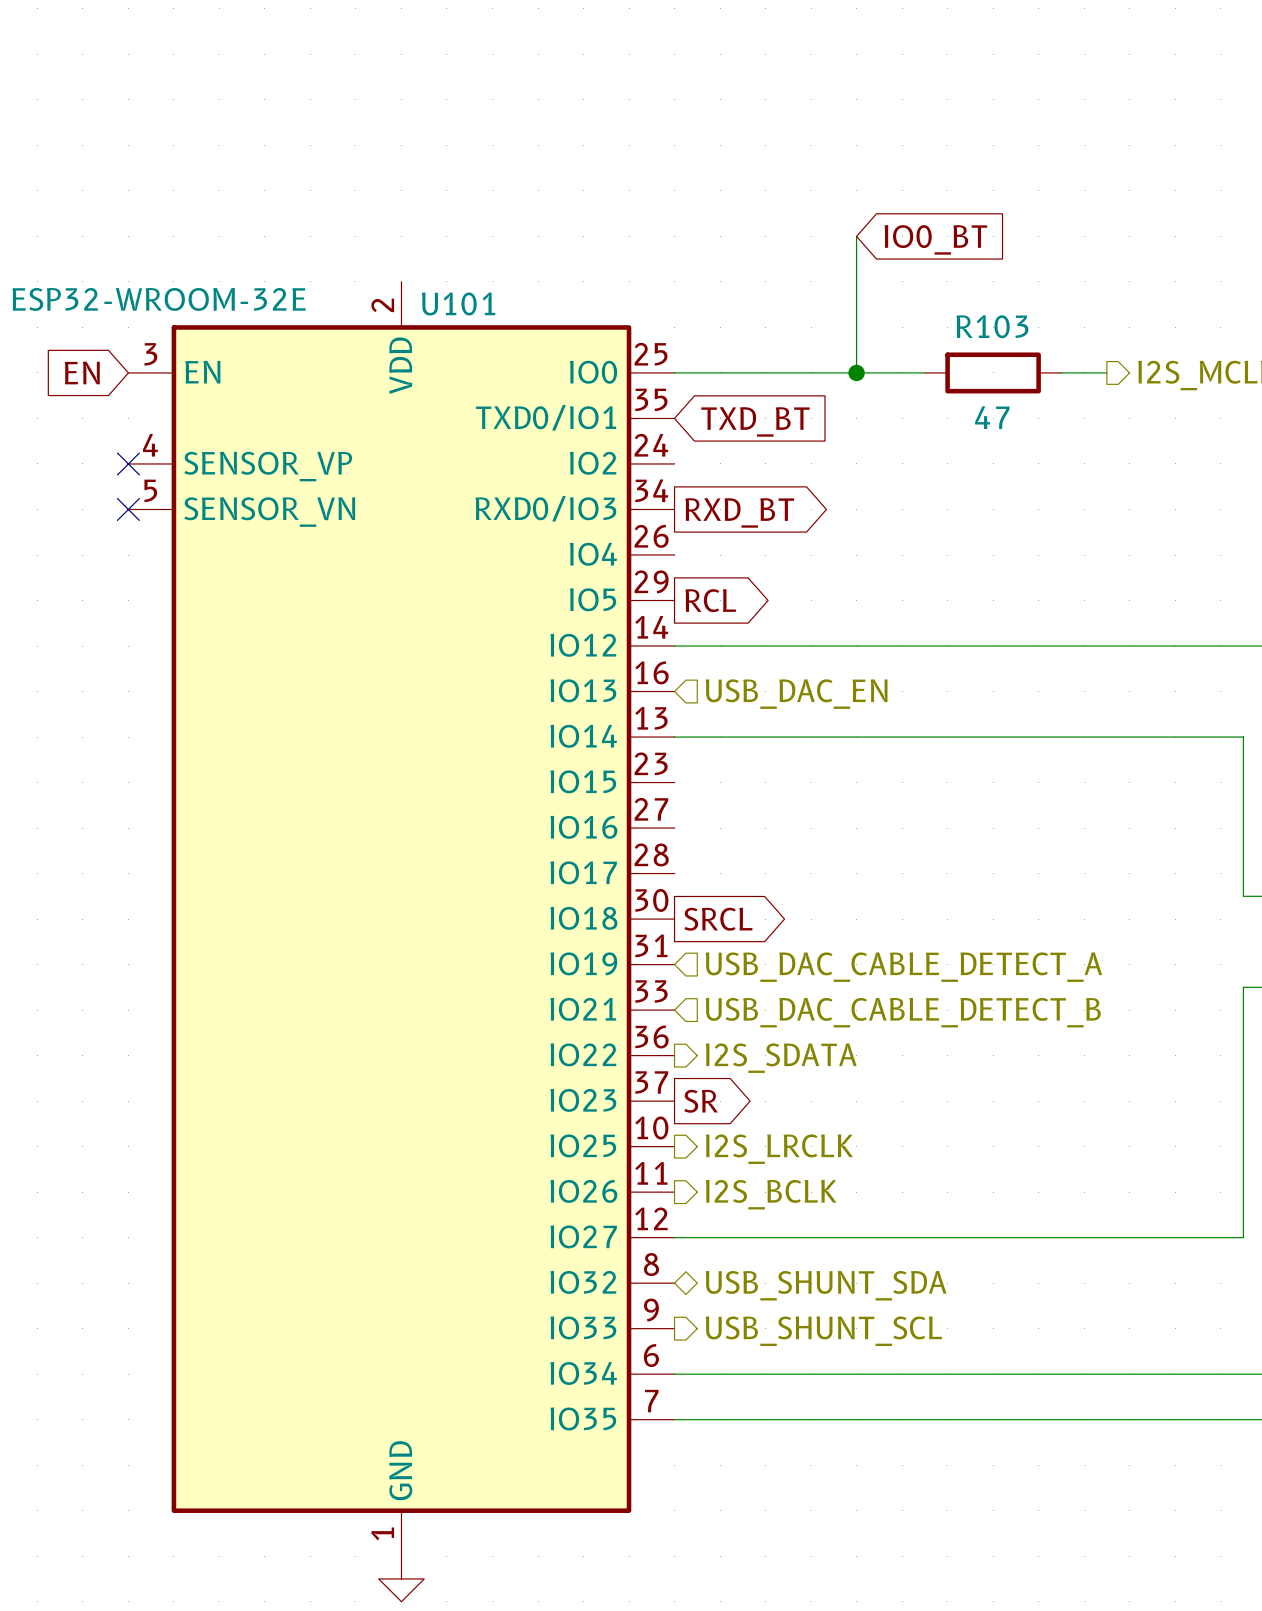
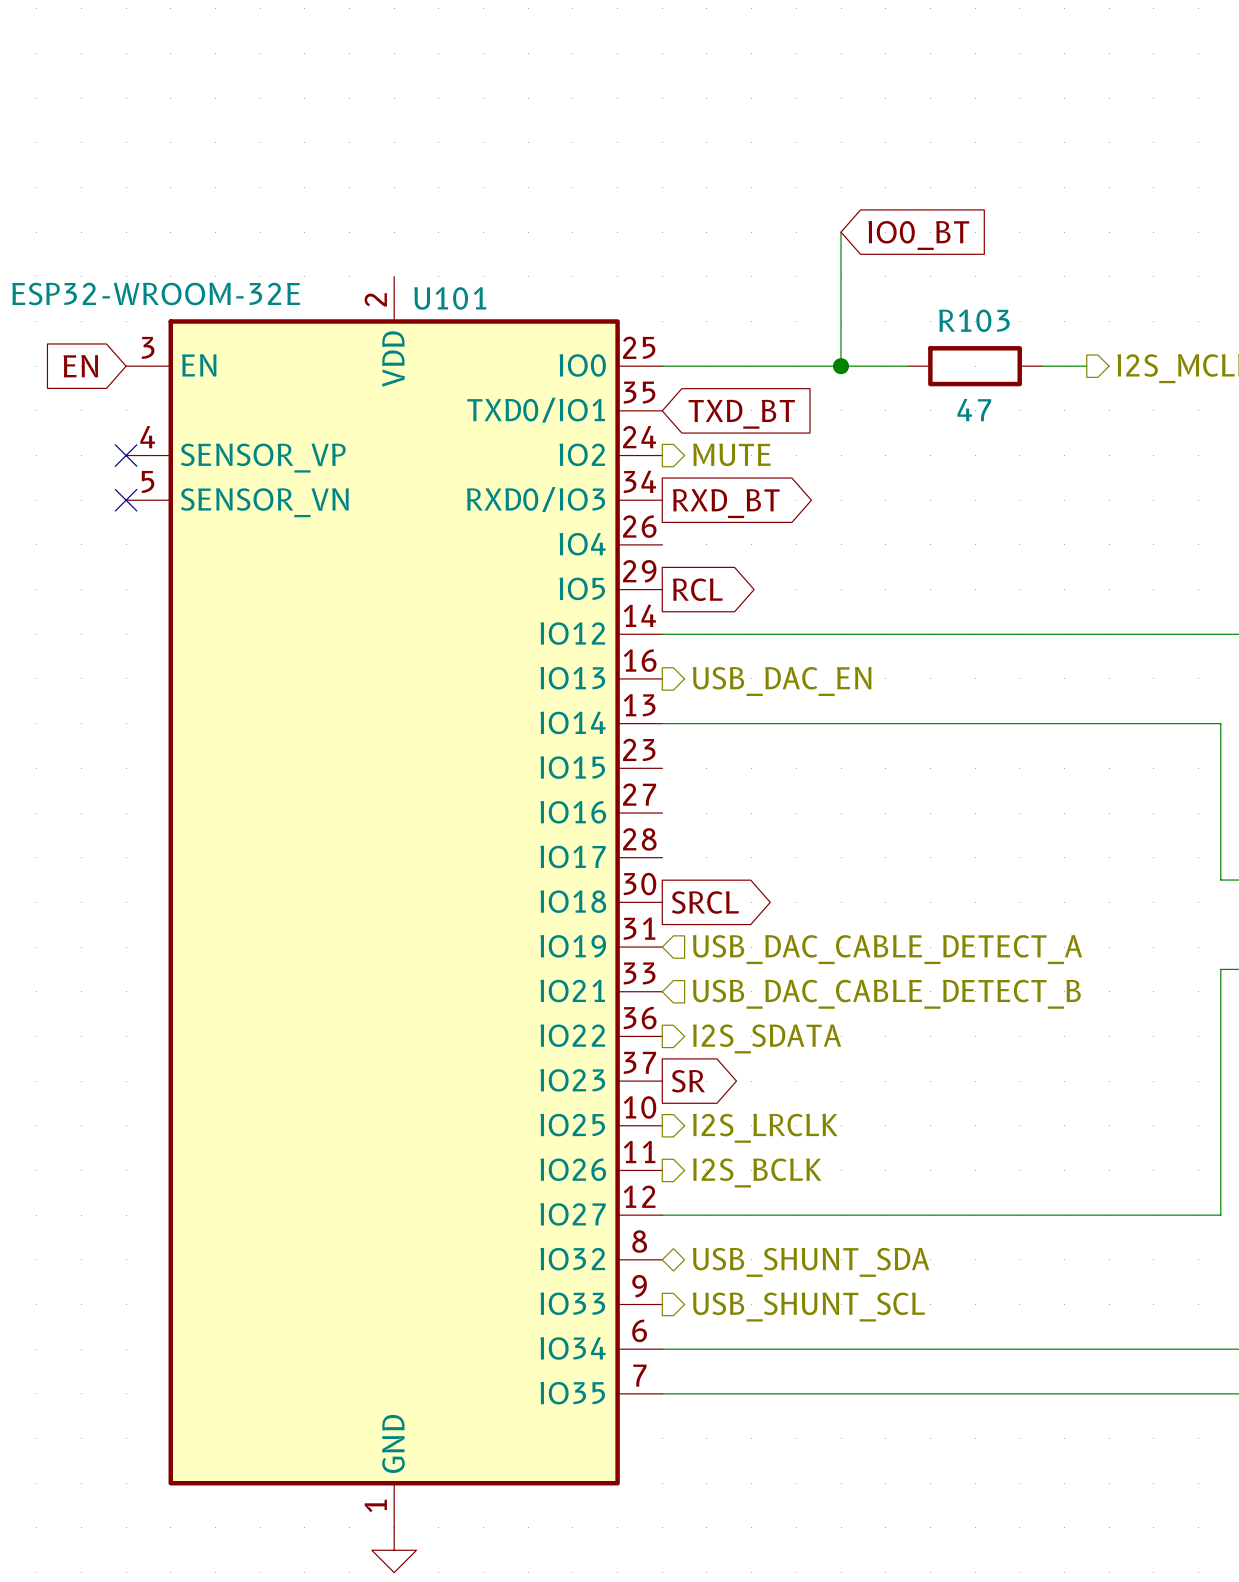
hierarchical label: none -> MUTE (731, 454)
hierarchical label shape: input (796, 694) -> output (782, 681)

